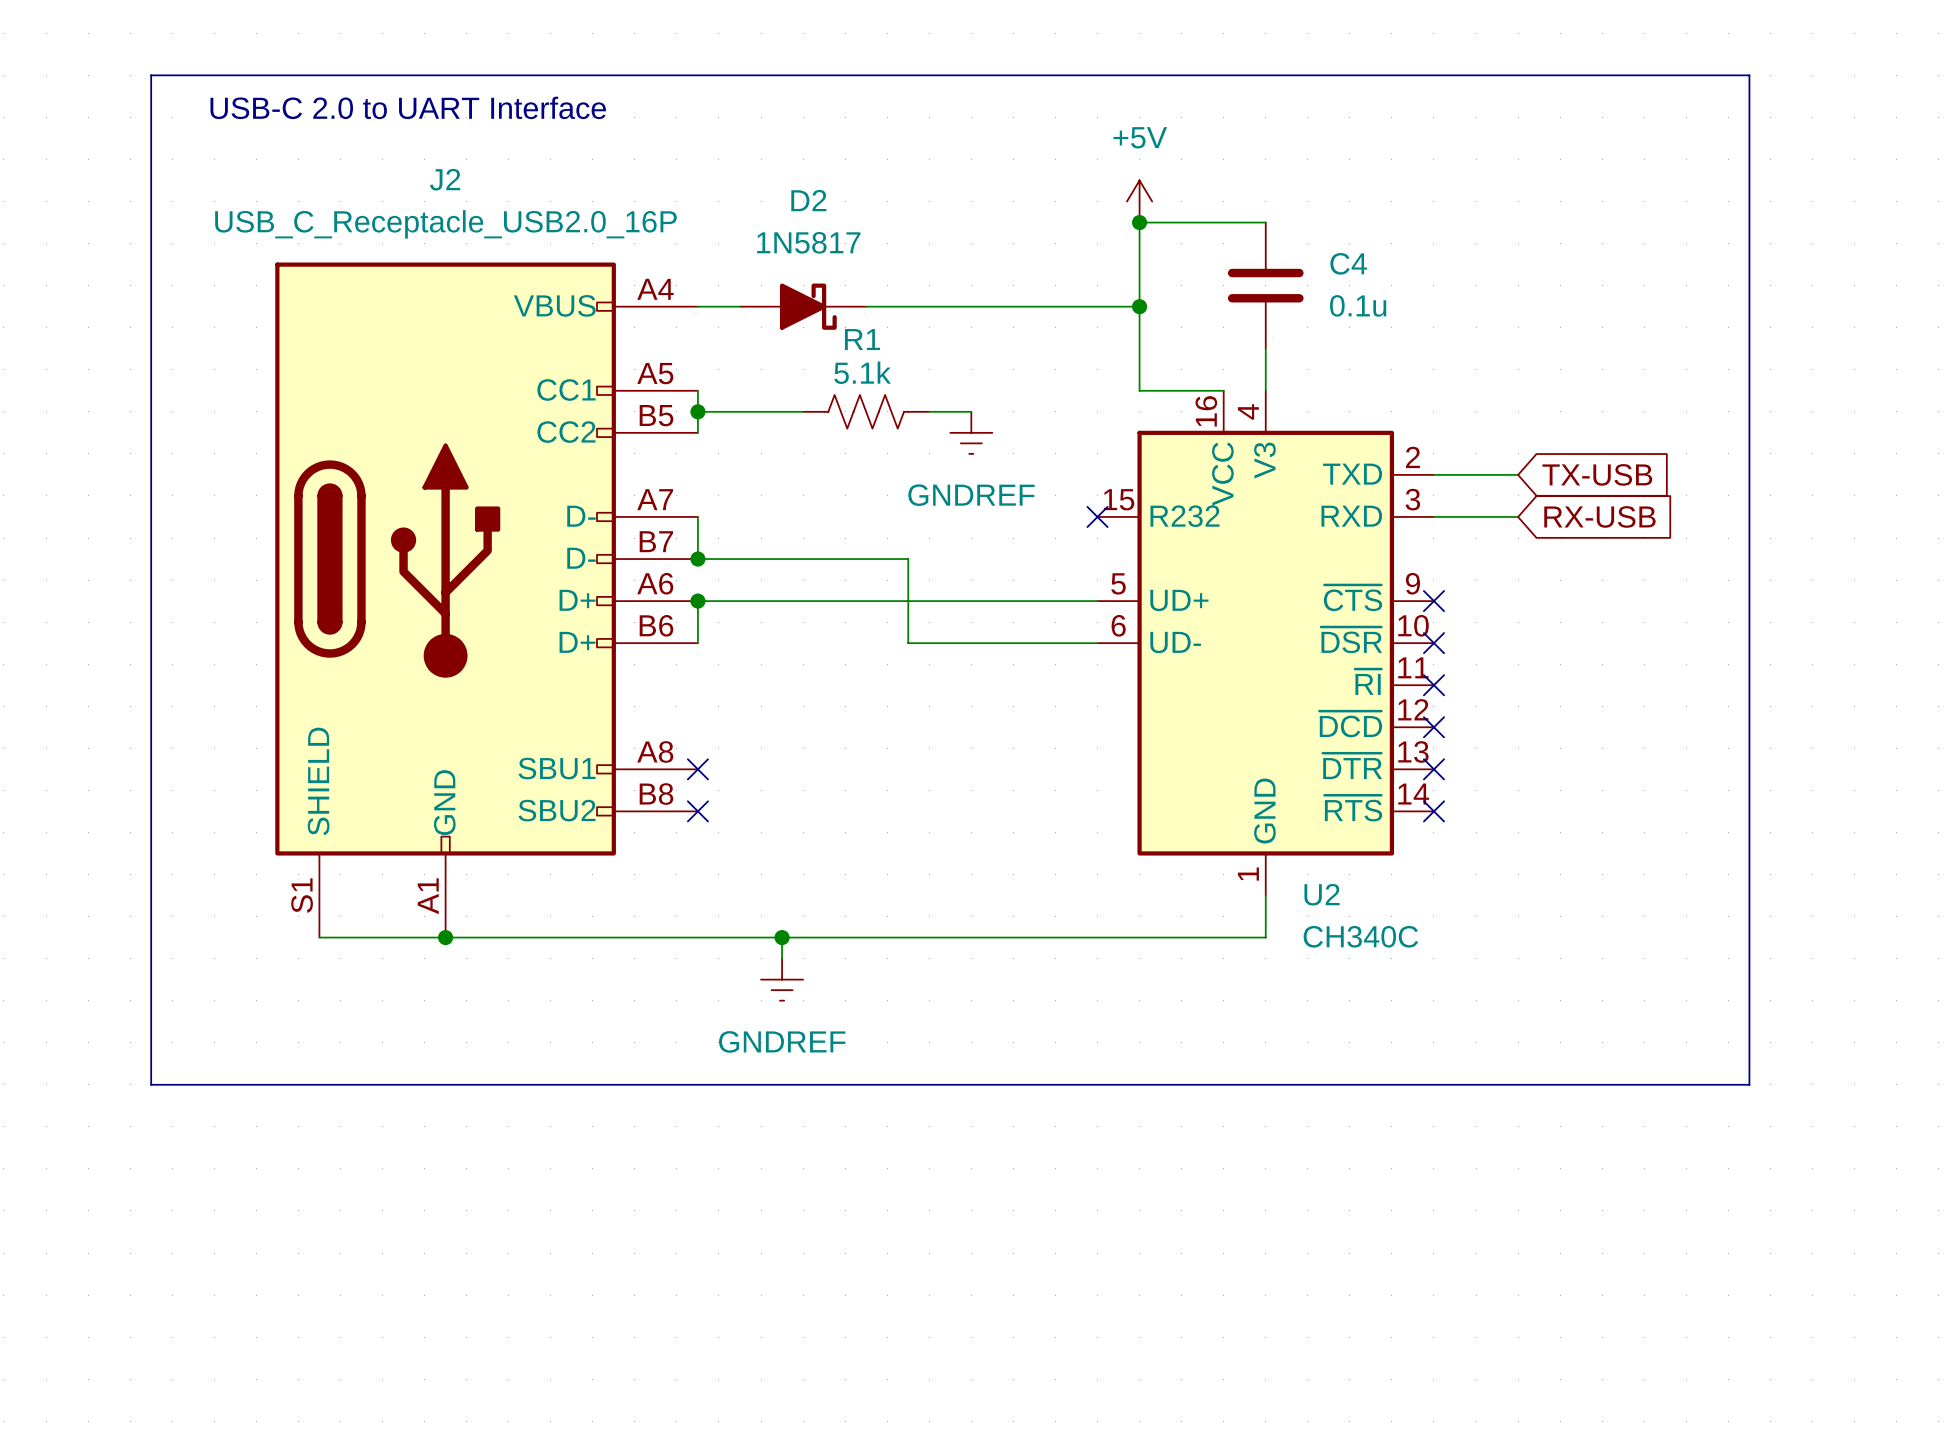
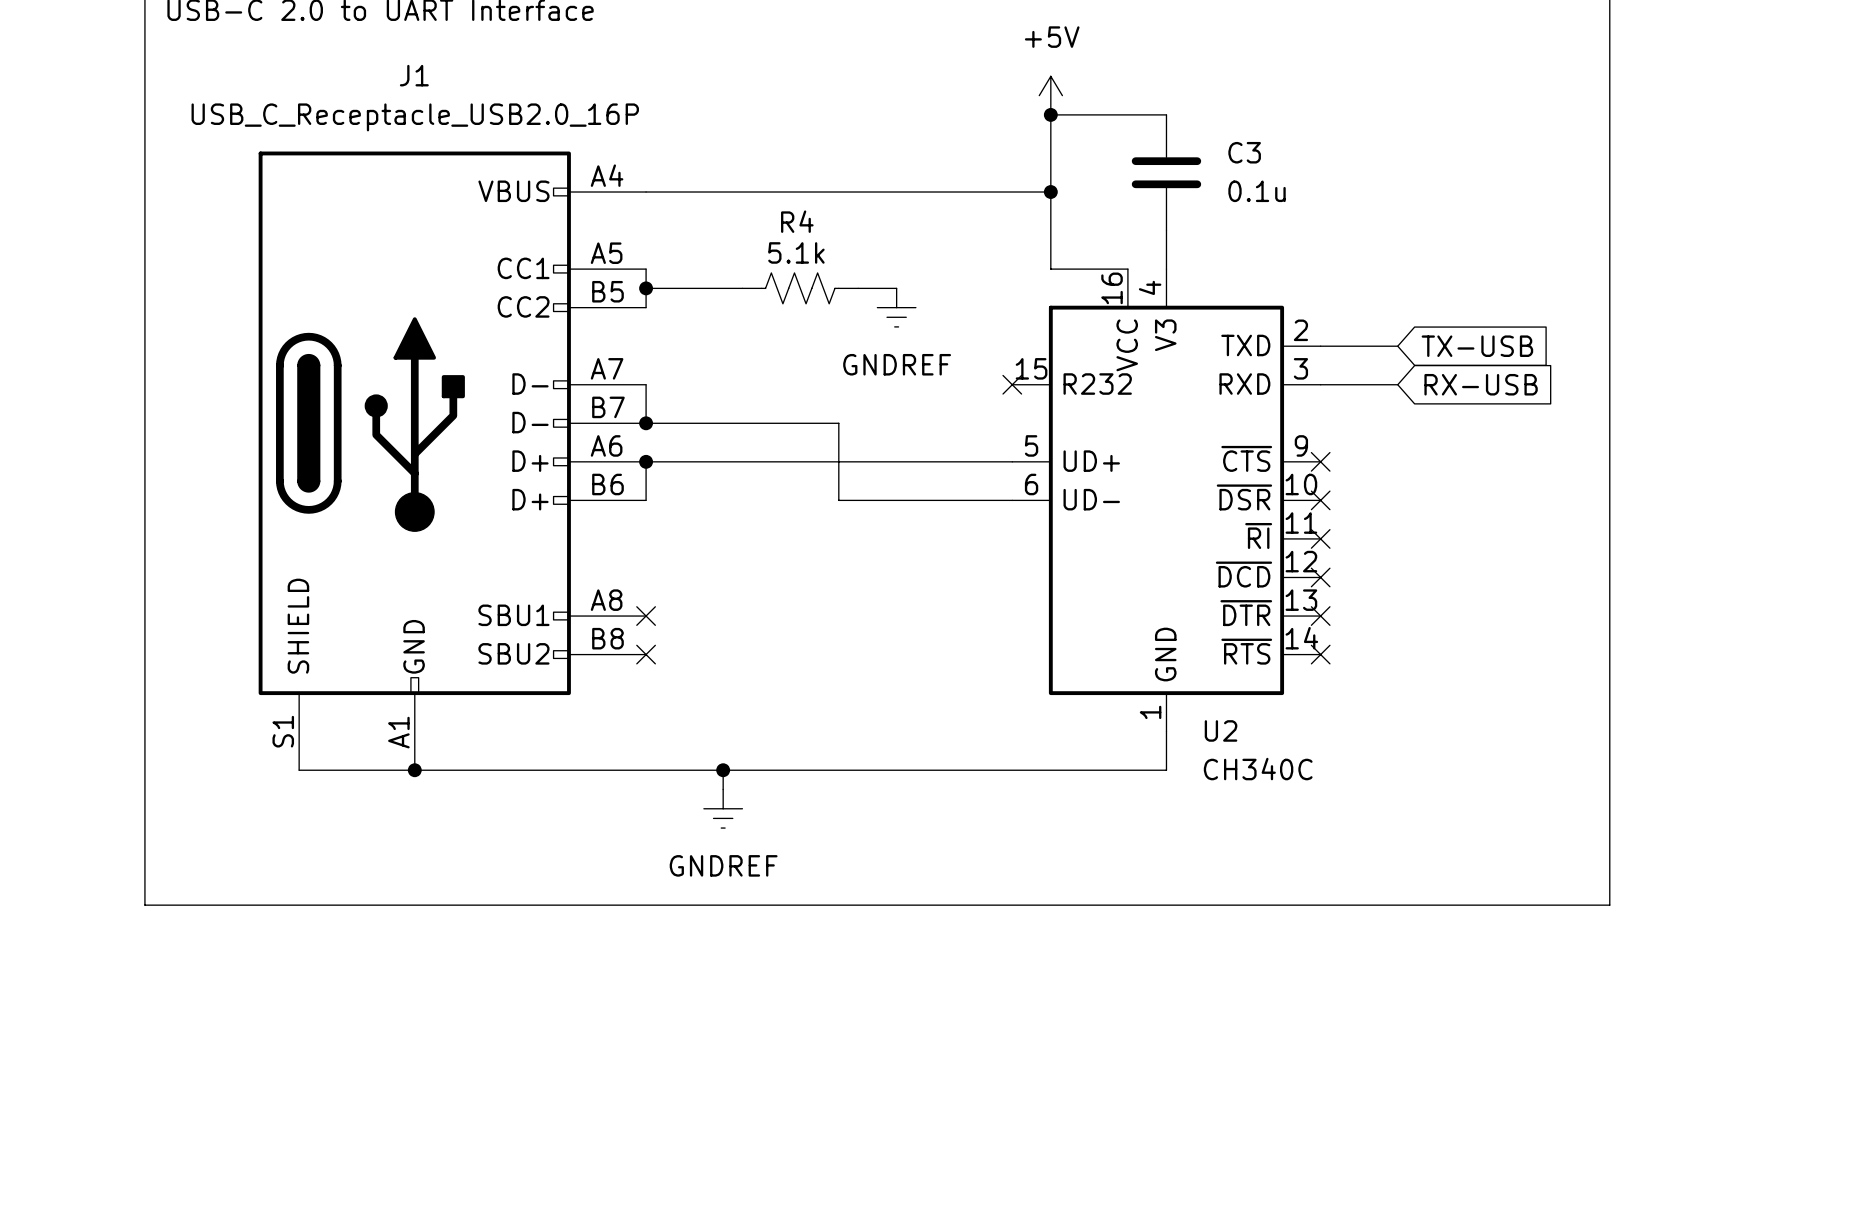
J2 name: J2 (445, 179) -> J1 (414, 75)
C4 name: C4 (1348, 263) -> C3 (1244, 152)
D2: 1N5817 (803, 306) -> none
R1 name: R1 (862, 339) -> R4 (797, 221)

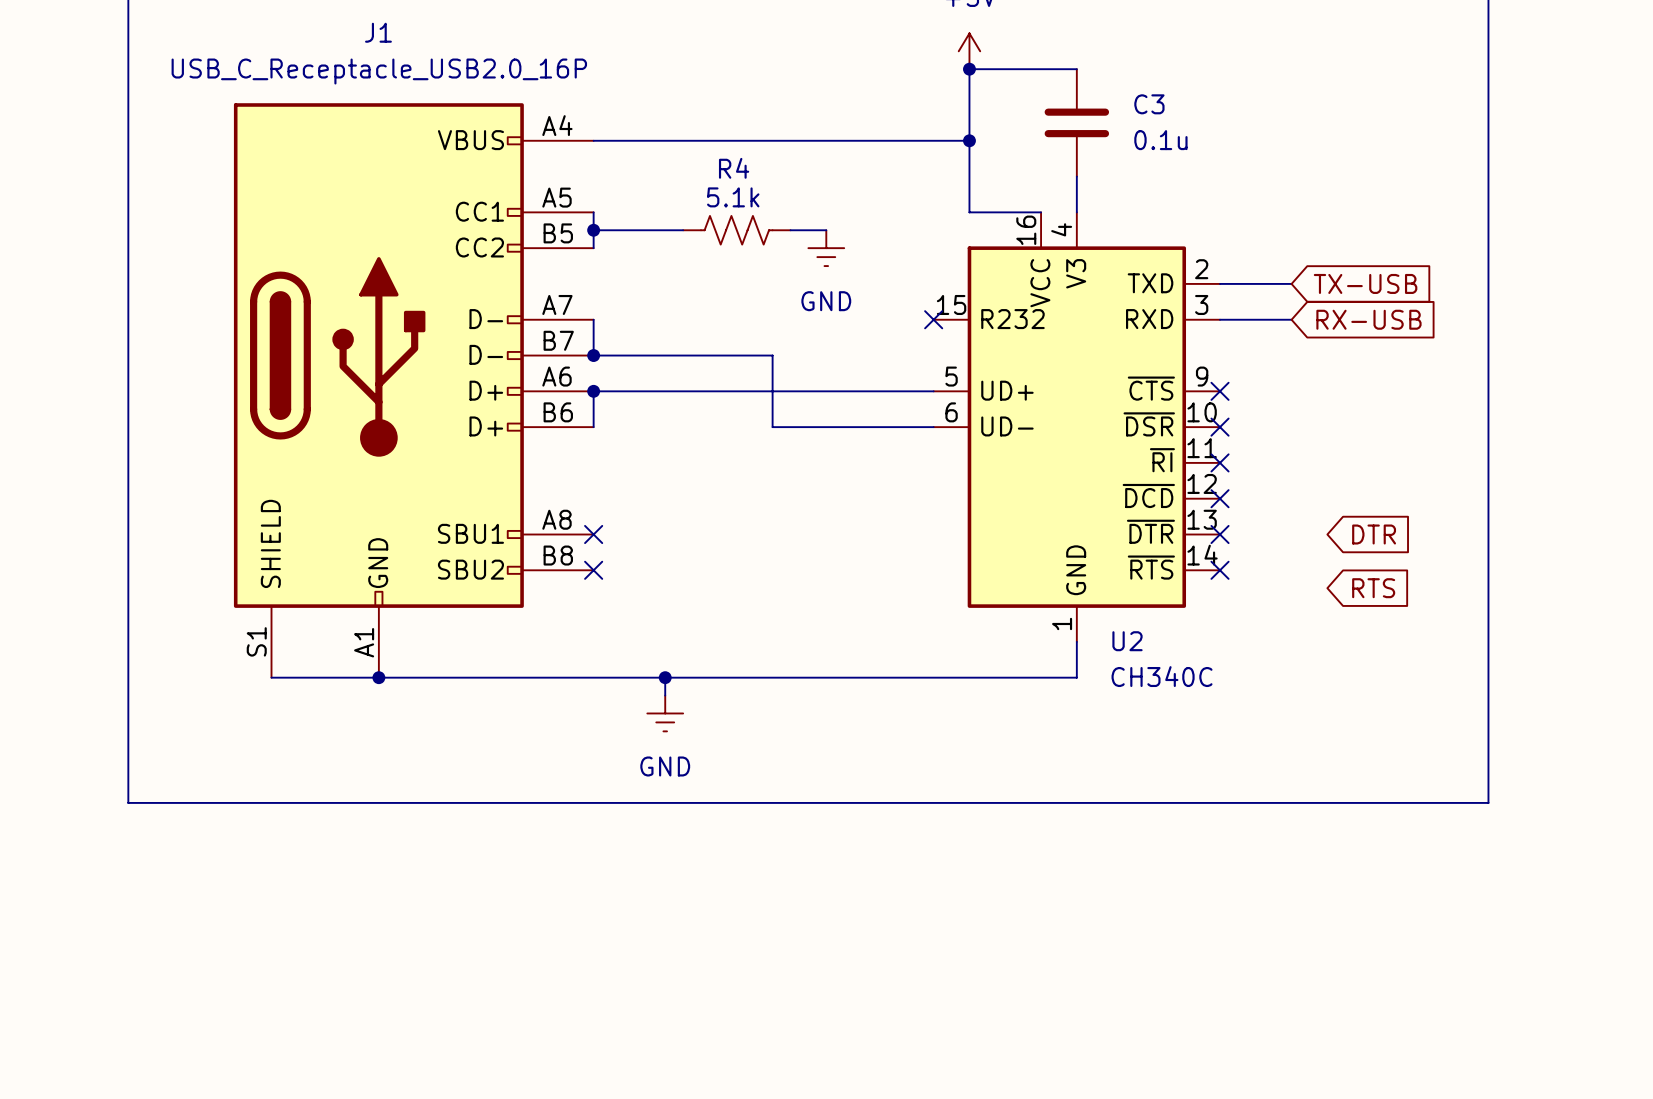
power symbol: GNDREF (896, 307) -> GND (826, 248)
global label: none -> DTR (1374, 534)
global label: none -> RTS (1373, 588)
power symbol: GNDREF (723, 808) -> GND (665, 713)

